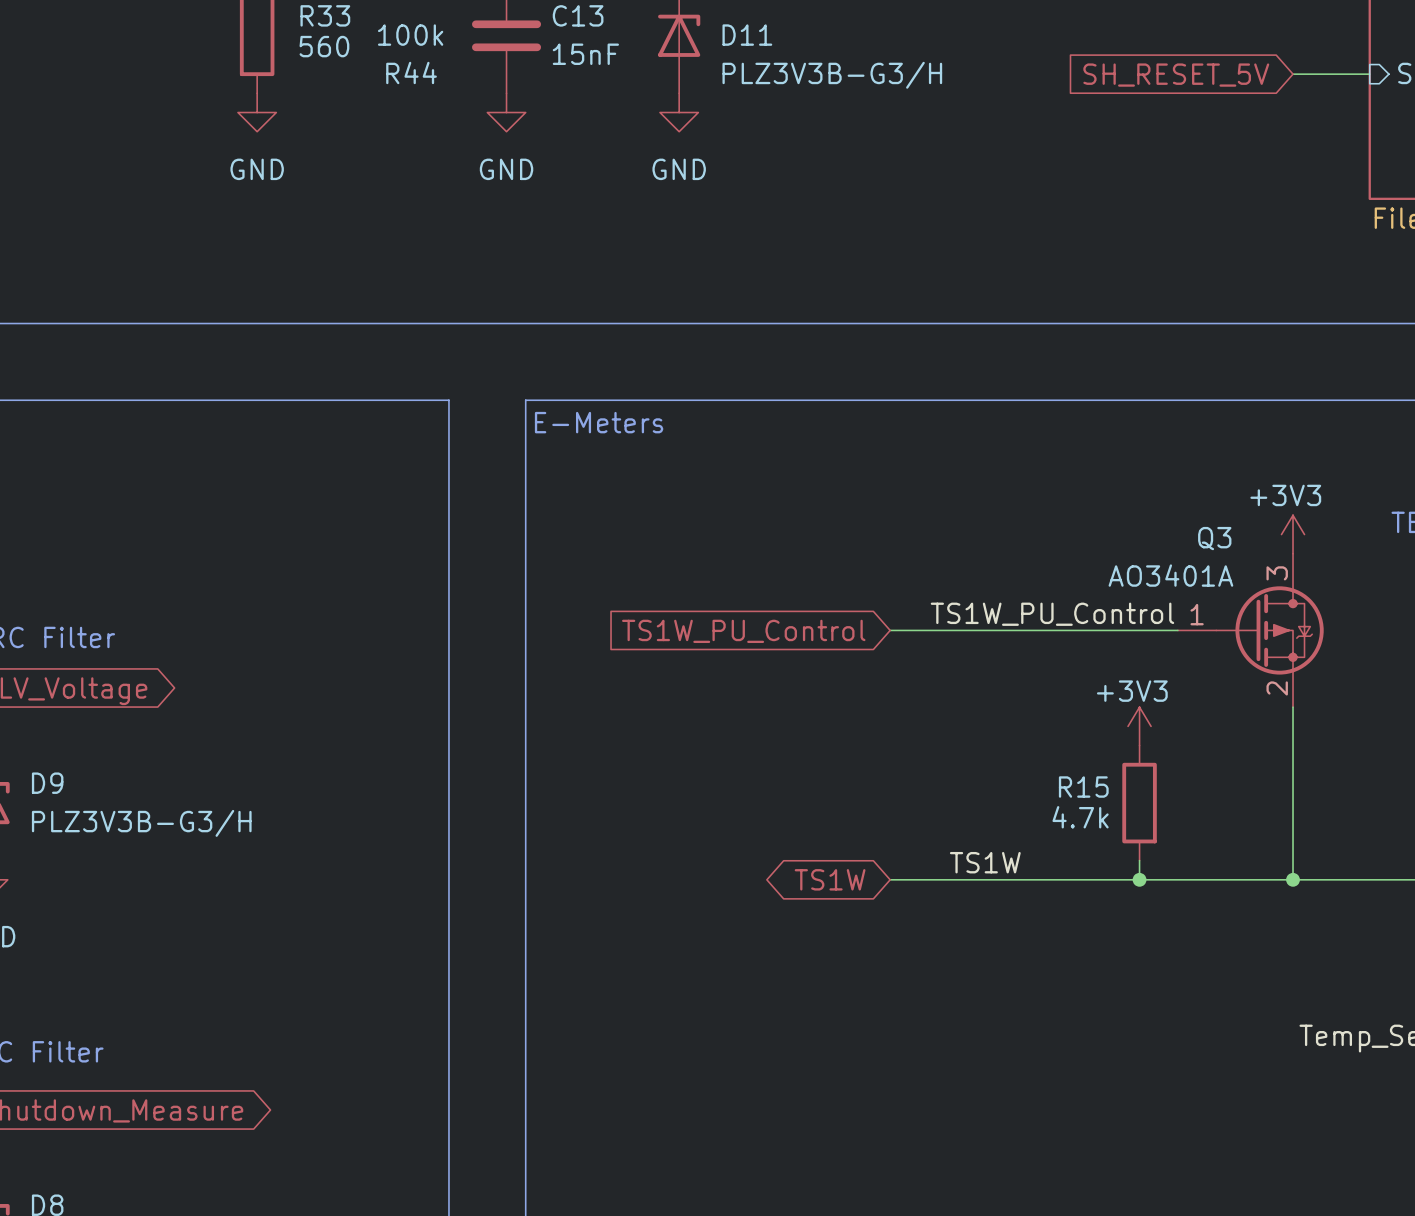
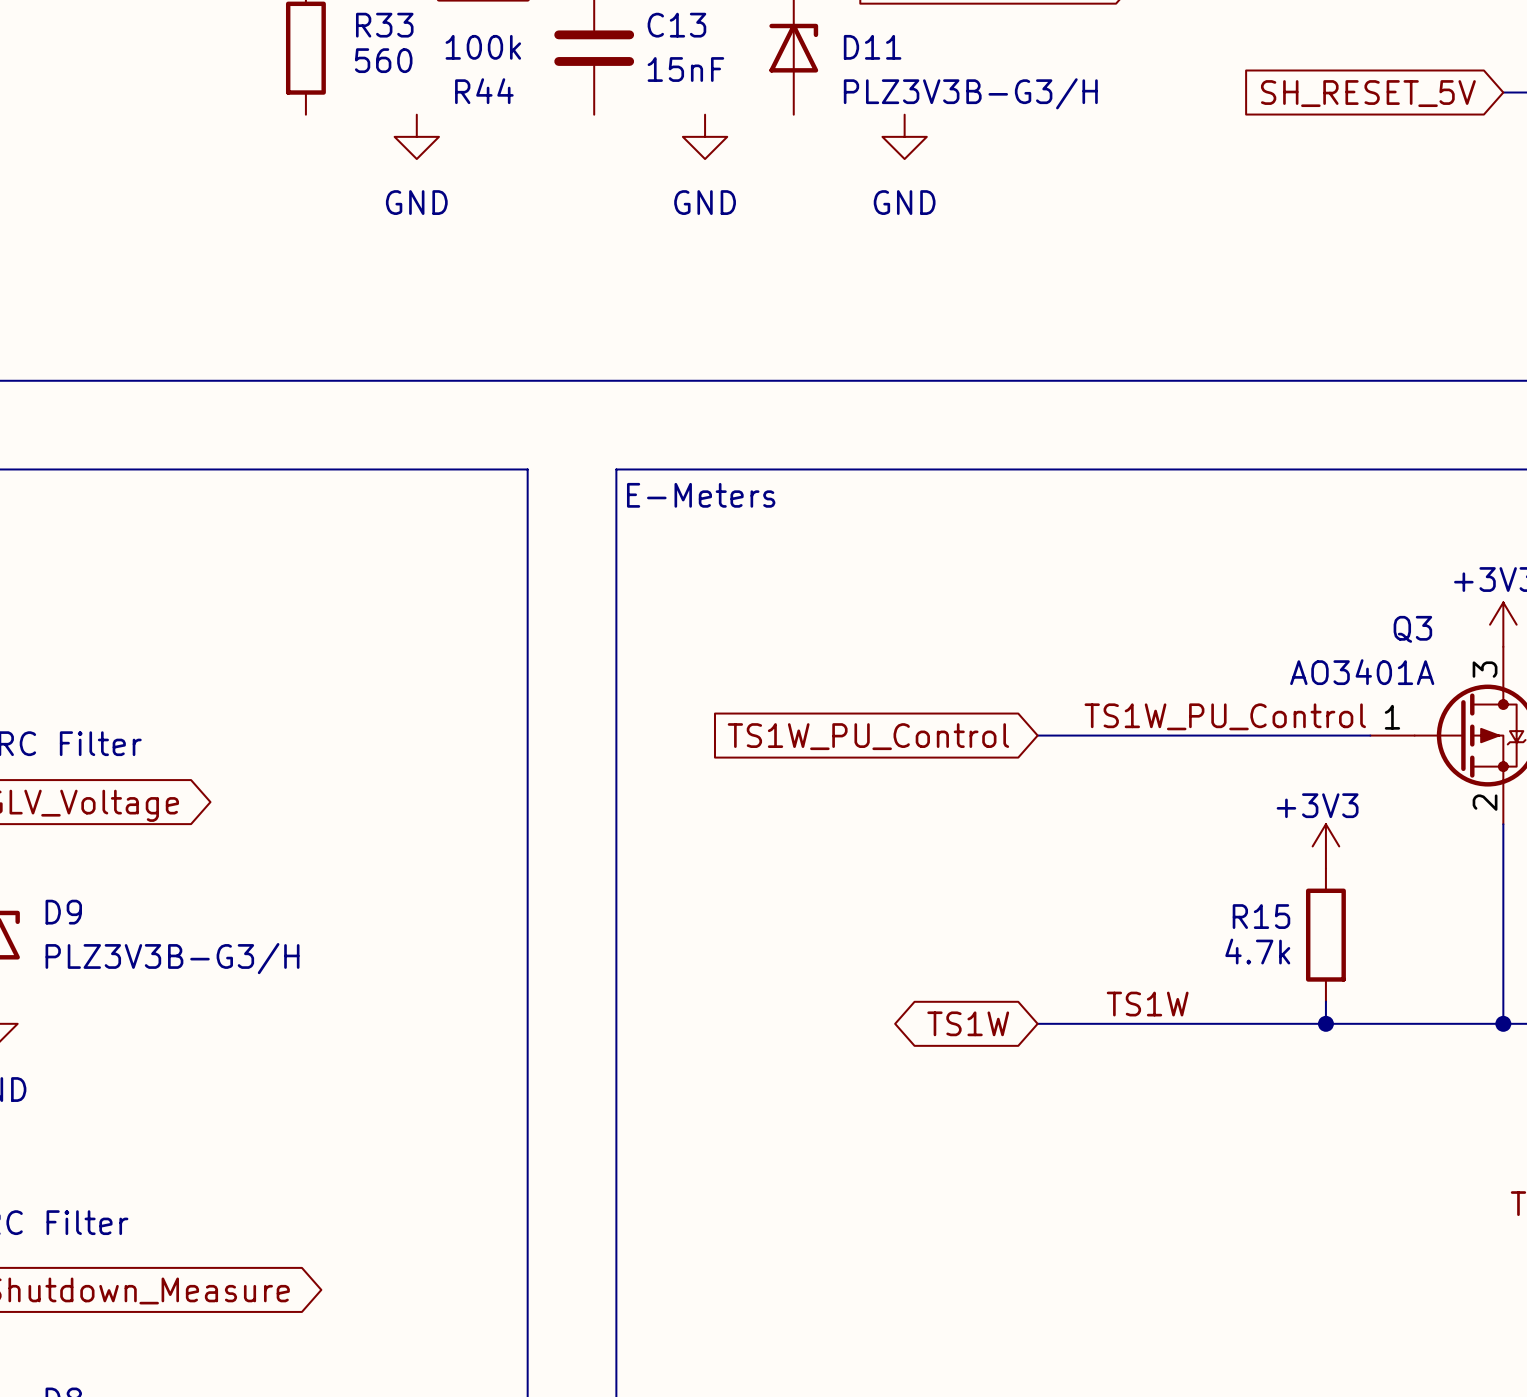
power symbol: GND (257, 112) -> none
power symbol: none -> GND (416, 136)
power symbol: GND (506, 112) -> none
power symbol: none -> GND (705, 136)
power symbol: GND (679, 112) -> none
power symbol: none -> GND (904, 136)

